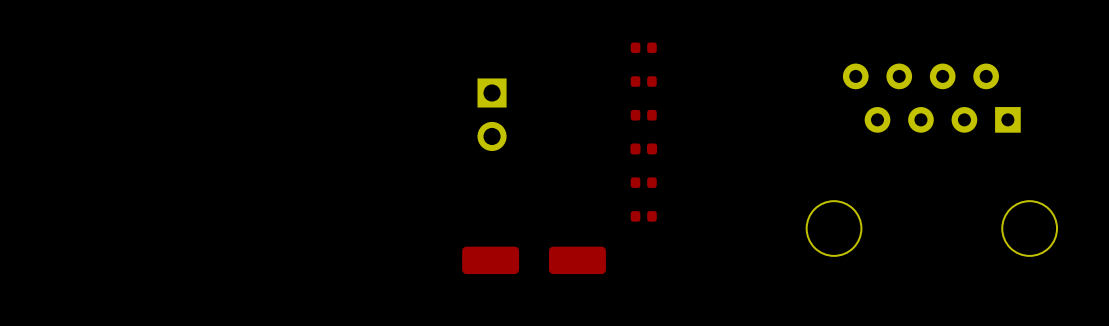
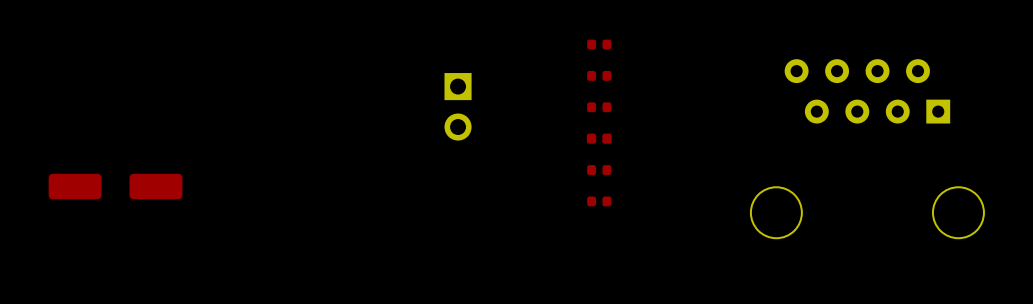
part position: (534, 260) -> (115, 186)

